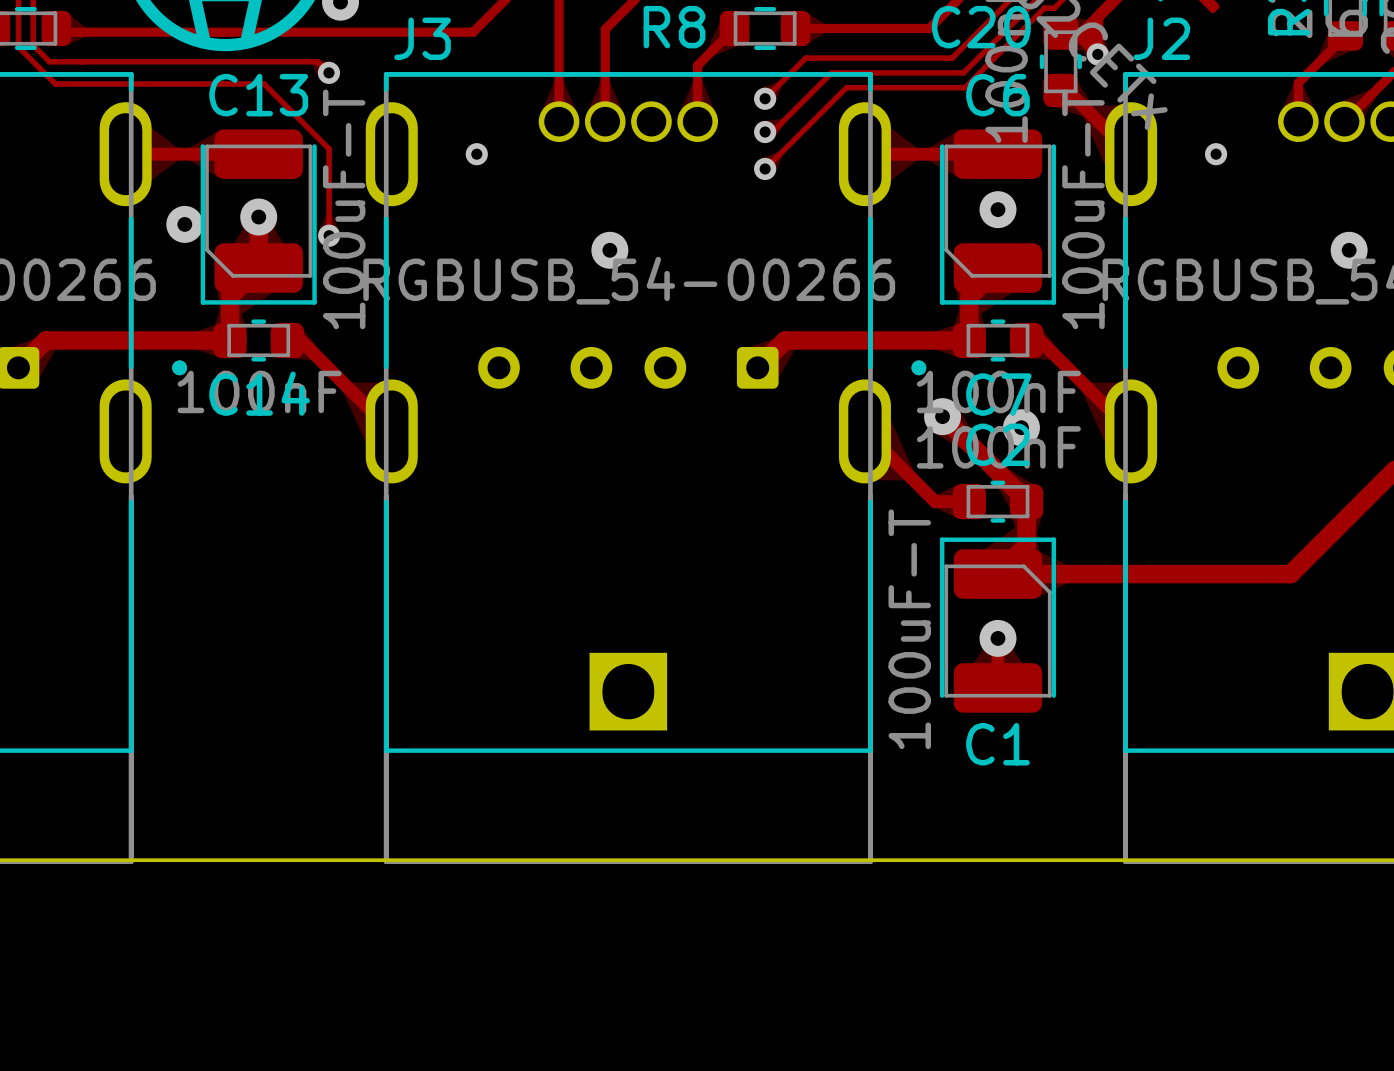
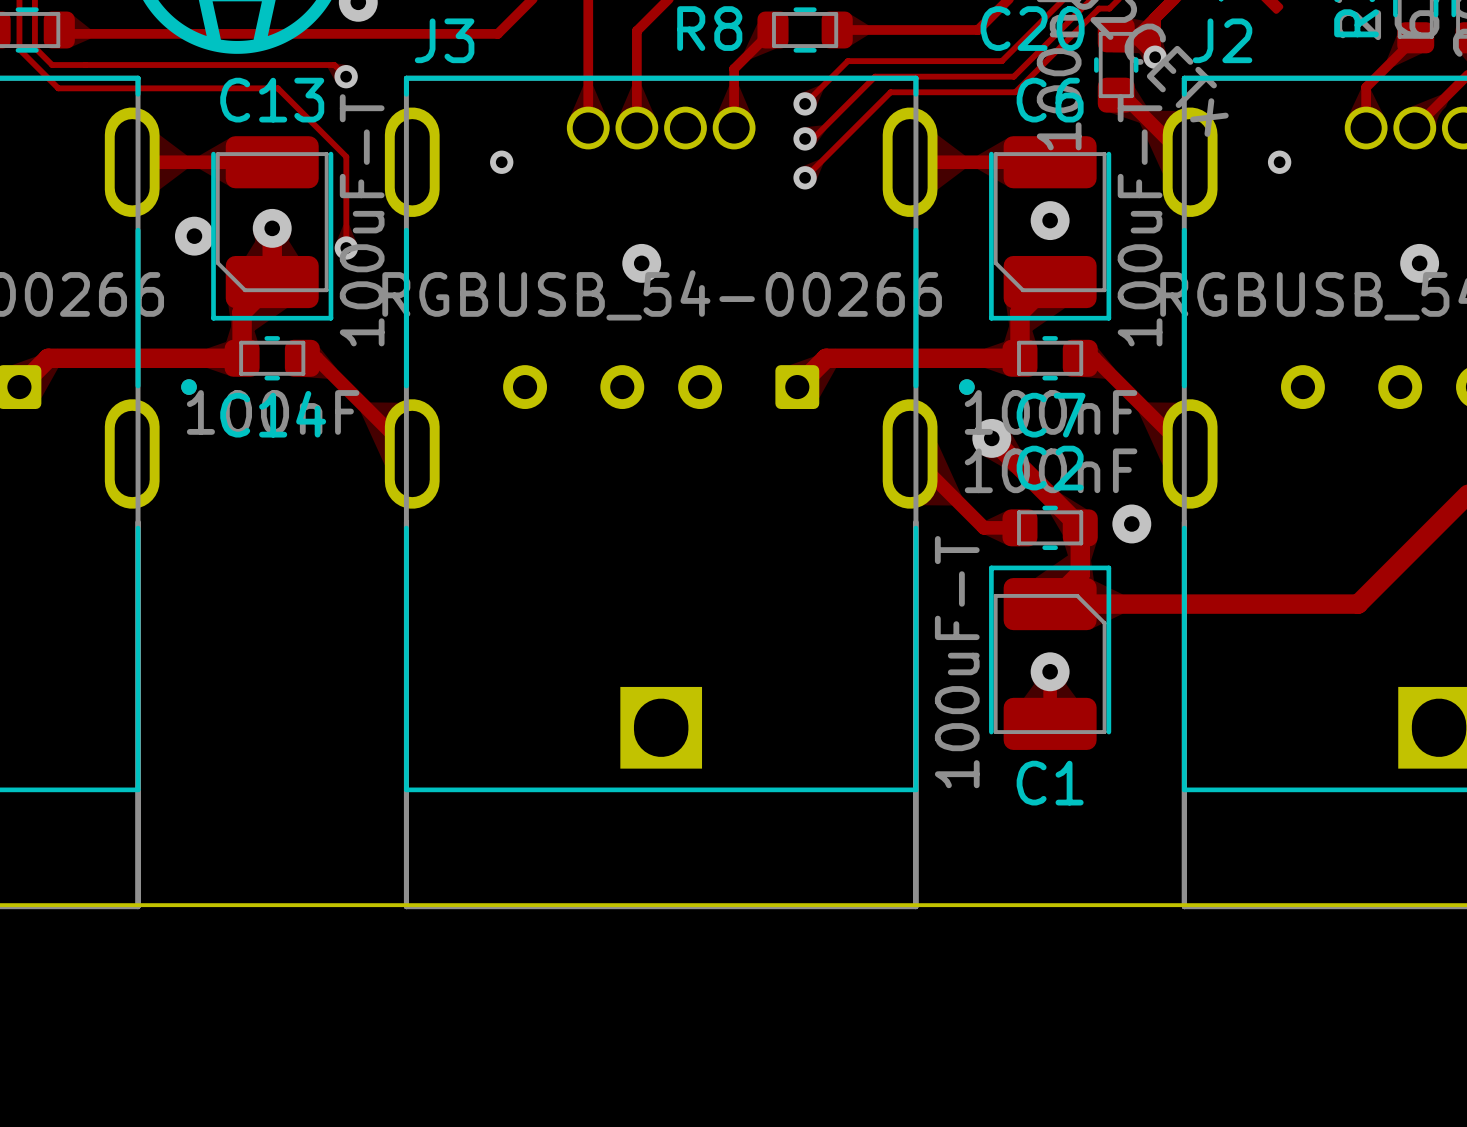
via position: (1021, 427) -> (1131, 523)

